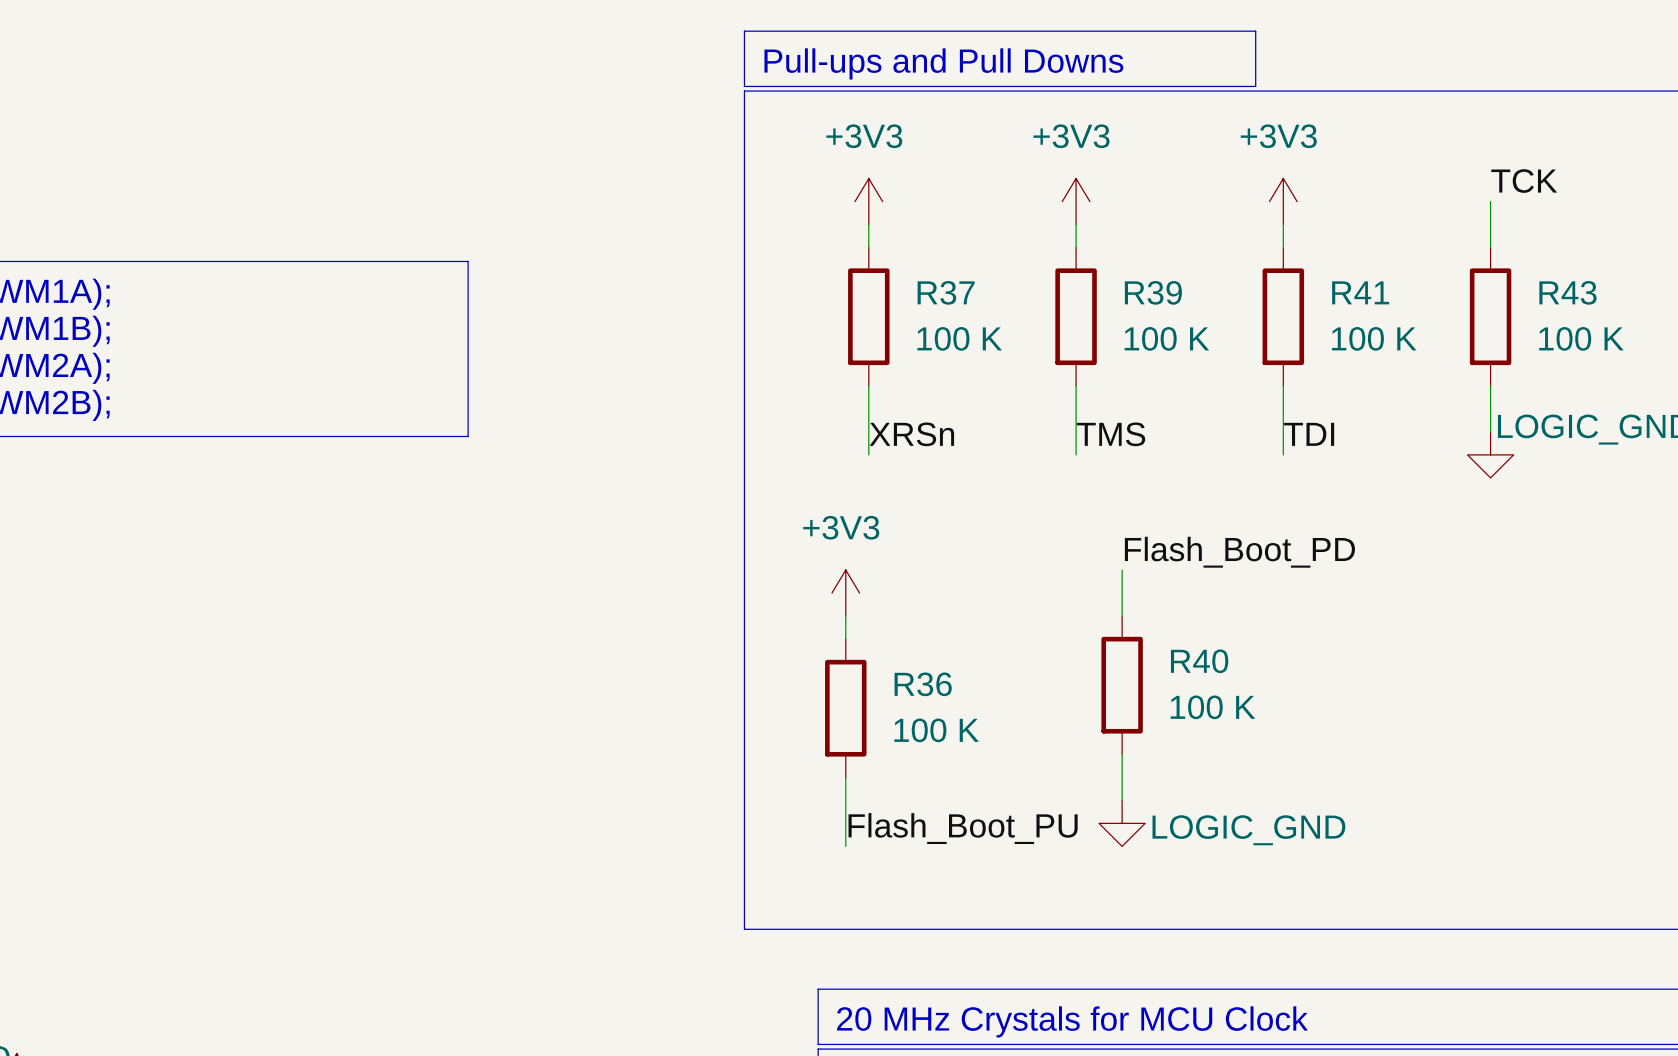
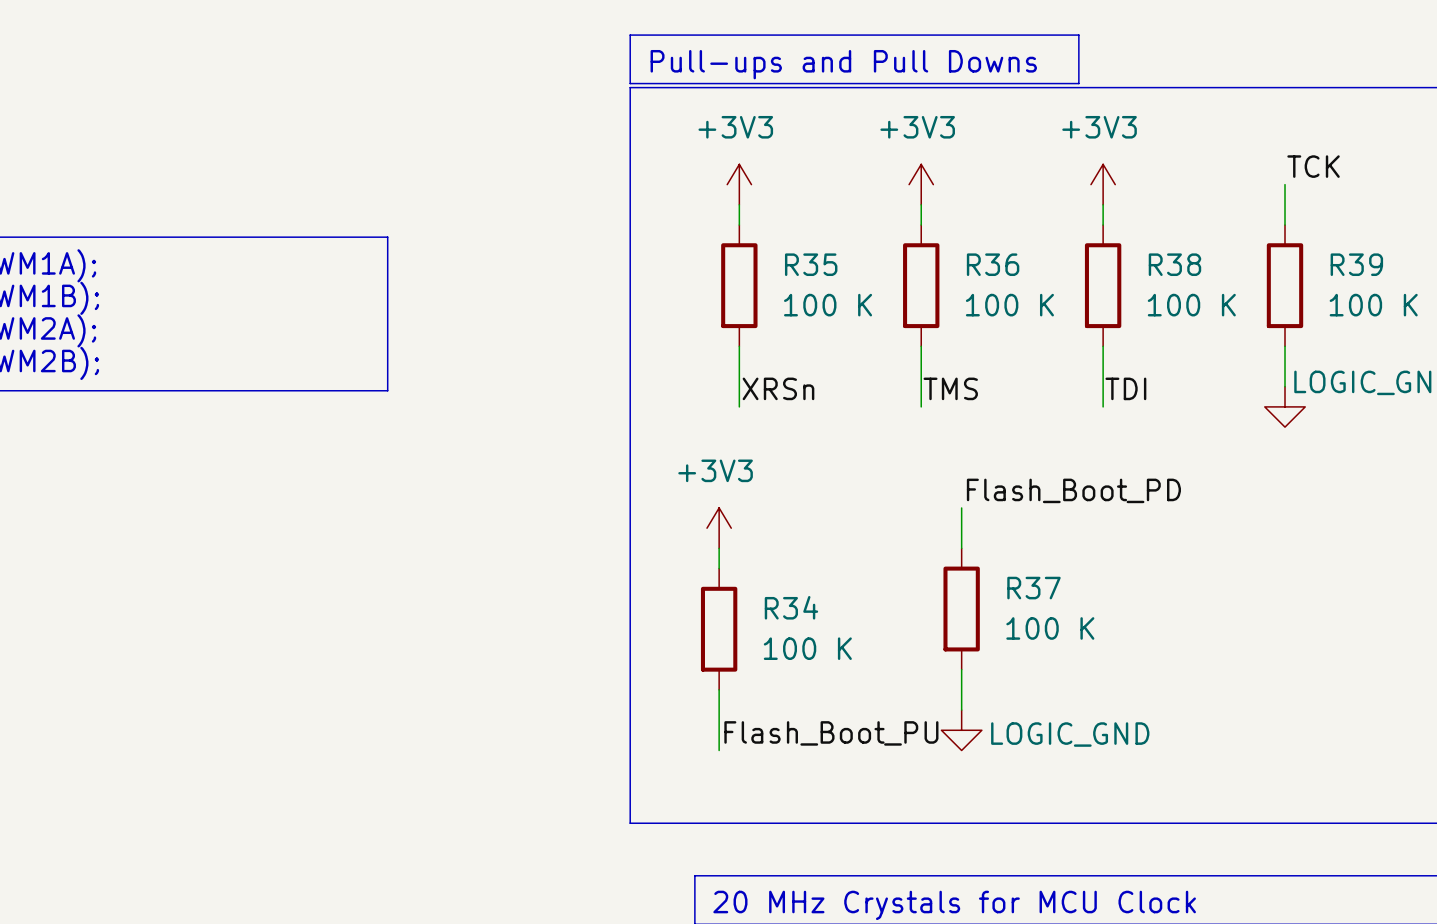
R37 name: R37 (946, 292) -> R35 (811, 264)
R39 name: R39 (1153, 292) -> R36 (993, 264)
R41 name: R41 (1360, 292) -> R38 (1174, 264)
R43 name: R43 (1567, 292) -> R39 (1356, 264)
R40 name: R40 (1199, 661) -> R37 (1033, 588)
R36 name: R36 (923, 684) -> R34 (791, 607)

